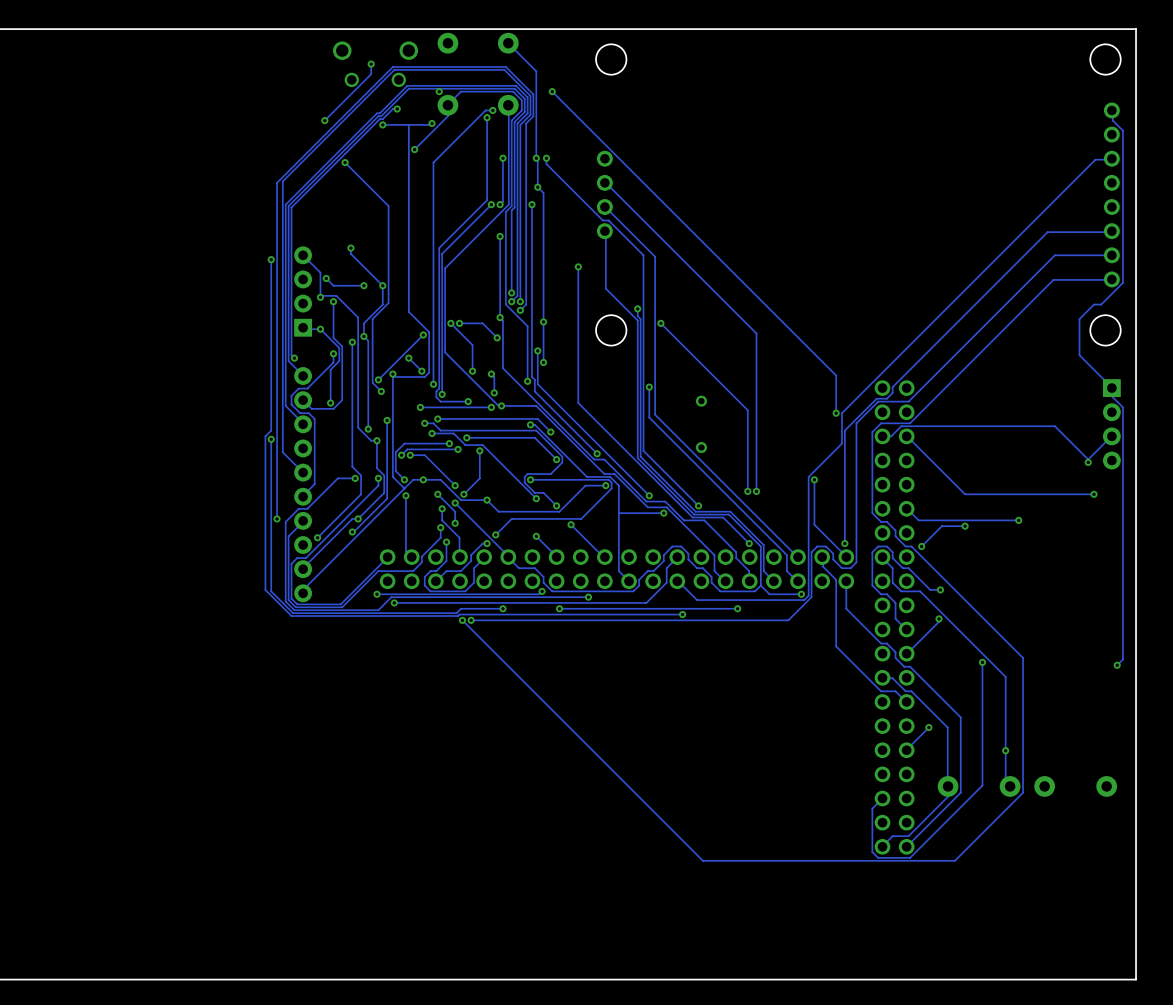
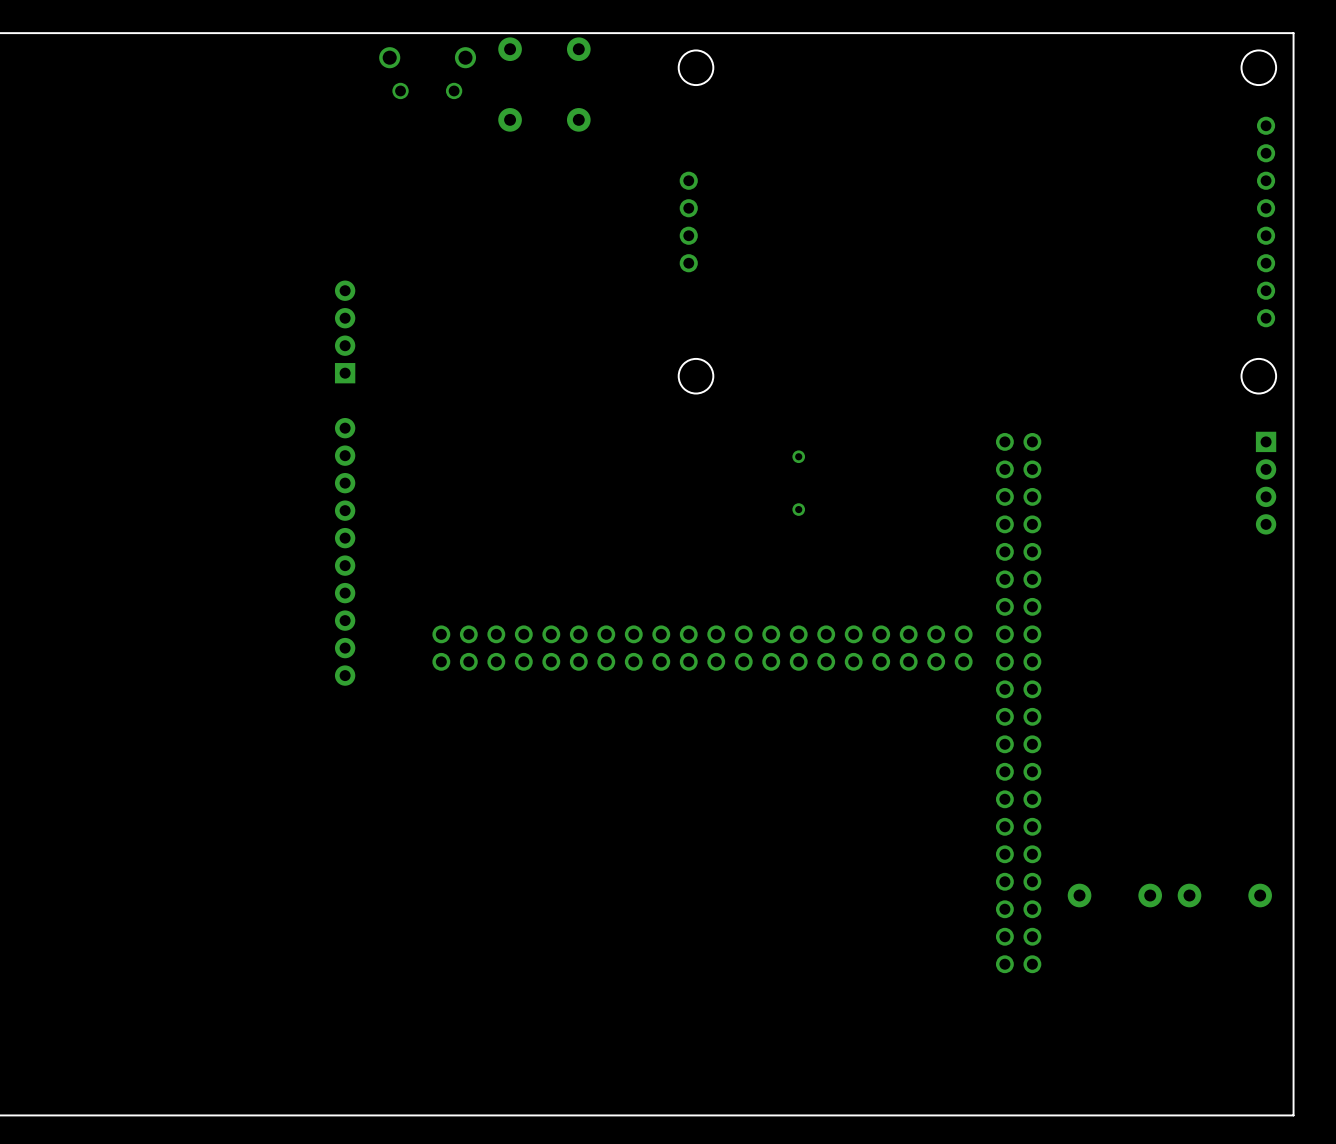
track: (508, 43) (536, 71) (537, 187) (543, 193) (543, 362) -> none
track: (371, 64) (371, 74) (324, 120) -> none
via: (371, 64) -> none
via: (439, 91) -> none
track: (552, 91) (836, 375) (836, 413) -> none
via: (552, 91) -> none
track: (508, 105) (508, 204) (445, 268) (445, 352) (498, 405) (536, 405) (604, 474) (614, 474) (647, 507) (666, 507) (714, 555) (714, 571) (725, 581) -> none
track: (397, 109) (392, 109) (382, 119) (379, 119) (291, 207) (291, 355) (294, 358) -> none
via: (397, 109) -> none
track: (492, 110) (485, 110) (433, 162) (433, 384) -> none
via: (492, 110) -> none
track: (1111, 110) (1112, 120) (1122, 130) (1122, 282) (1101, 304) (1094, 304) (1079, 319) (1079, 355) (1112, 388) (1112, 397) (1122, 407) (1122, 659) (1117, 665) -> none
track: (487, 117) (487, 200) (439, 248) (439, 388) (436, 391) (436, 397) (440, 401) (468, 401) -> none
via: (487, 117) -> none
via: (324, 120) -> none
track: (432, 123) (382, 124) -> none
via: (432, 123) -> none
via: (382, 124) -> none
track: (408, 124) (408, 311) (429, 332) (429, 372) (424, 376) (392, 376) -> none
track: (414, 149) (447, 116) (447, 104) (460, 91) (513, 91) (521, 100) (521, 110) (511, 120) (511, 206) (505, 211) (505, 304) (527, 326) (527, 381) -> none
via: (414, 149) -> none
track: (503, 158) (503, 201) (500, 204) -> none
via: (503, 158) -> none
via: (536, 158) -> none
track: (546, 158) (546, 164) (602, 220) (608, 220) (643, 255) (643, 450) (698, 505) -> none
via: (546, 158) -> none
track: (1111, 158) (1095, 159) (841, 413) (841, 443) (808, 476) (808, 595) (804, 600) (697, 600) (677, 581) -> none
track: (345, 162) (388, 206) (388, 303) (372, 319) (372, 382) (381, 391) -> none
via: (345, 162) -> none
track: (604, 182) (756, 333) (756, 491) -> none
via: (537, 187) -> none
track: (491, 204) (442, 253) (442, 394) -> none
via: (491, 204) -> none
via: (500, 204) -> none
track: (531, 204) (531, 376) (534, 379) (534, 391) (597, 453) -> none
via: (531, 204) -> none
track: (604, 207) (655, 256) (655, 414) (798, 557) -> none
track: (604, 231) (605, 288) (637, 320) (637, 458) (694, 514) (728, 514) (760, 546) (760, 585) -> none
track: (1111, 231) (1047, 232) (892, 387) (892, 392) (886, 398) (876, 398) (844, 430) (844, 543) -> none
track: (500, 236) (500, 317) (503, 320) (503, 368) (594, 459) (604, 459) (646, 501) (665, 501) (684, 520) (704, 520) (736, 552) (736, 558) (749, 571) (749, 581) -> none
via: (500, 236) -> none
track: (350, 248) (350, 253) (382, 285) (382, 304) (363, 323) (363, 336) (368, 340) (368, 429) -> none
via: (350, 248) -> none
track: (303, 255) (320, 272) (320, 297) -> none
track: (1111, 255) (1054, 255) (908, 401) (878, 401) (856, 423) (856, 562) (850, 568) (841, 568) (833, 559) (833, 553) (826, 546) (817, 546) (811, 552) (811, 597) (788, 620) (471, 620) -> none
track: (271, 259) (271, 430) (265, 436) (265, 589) (291, 616) (682, 614) -> none
via: (271, 259) -> none
track: (578, 266) (578, 403) (692, 517) (723, 517) (749, 543) -> none
via: (578, 266) -> none
track: (326, 278) (333, 285) (363, 285) -> none
via: (326, 278) -> none
track: (1111, 279) (1053, 279) (910, 423) (881, 423) (872, 432) (872, 513) (881, 521) (886, 521) (895, 530) (895, 536) (905, 546) (911, 546) (1023, 658) (1023, 792) (954, 860) (702, 860) (462, 620) -> none
via: (363, 285) -> none
via: (382, 285) -> none
track: (511, 292) (514, 122) (524, 111) (524, 98) (514, 88) (408, 88) (381, 116) (378, 116) (288, 206) (288, 361) (303, 376) -> none
via: (511, 292) -> none
track: (320, 295) (336, 295) (358, 317) (358, 427) (371, 440) (376, 440) (376, 468) (384, 475) (384, 492) (358, 518) (352, 518) (303, 569) -> none
via: (320, 297) -> none
track: (333, 301) (333, 337) (342, 346) (342, 400) (333, 408) (311, 408) (303, 400) -> none
via: (333, 301) -> none
track: (511, 301) (517, 295) (517, 123) (527, 113) (527, 97) (516, 85) (407, 85) (379, 113) (376, 113) (285, 204) (285, 405) (303, 424) -> none
via: (511, 301) -> none
track: (520, 301) (520, 124) (530, 114) (530, 95) (504, 69) (394, 69) (282, 181) (282, 452) (303, 472) -> none
via: (520, 301) -> none
track: (637, 308) (637, 316) (640, 319) (640, 456) (695, 511) (730, 511) (763, 545) (763, 571) (773, 581) -> none
via: (637, 308) -> none
track: (520, 310) (526, 304) (526, 123) (533, 116) (533, 94) (505, 66) (392, 66) (277, 182) (277, 518) -> none
via: (520, 310) -> none
via: (500, 317) -> none
via: (543, 321) -> none
track: (450, 323) (472, 345) (472, 371) -> none
via: (450, 323) -> none
track: (459, 323) (482, 323) (497, 337) -> none
via: (459, 323) -> none
track: (660, 323) (747, 410) (747, 491) -> none
via: (660, 323) -> none
track: (303, 327) (320, 329) (339, 348) (339, 361) (330, 369) (330, 403) -> none
via: (320, 329) -> none
track: (423, 334) (378, 379) -> none
via: (423, 334) -> none
via: (363, 336) -> none
via: (497, 337) -> none
track: (352, 342) (352, 466) (361, 475) (361, 494) (317, 537) -> none
via: (352, 342) -> none
track: (537, 350) (537, 384) (649, 495) -> none
via: (537, 350) -> none
track: (333, 353) (333, 362) (307, 388) (298, 388) (291, 395) (291, 404) (300, 413) (308, 413) (314, 419) (314, 484) (303, 496) -> none
via: (333, 353) -> none
via: (294, 358) -> none
track: (408, 358) (421, 371) -> none
via: (408, 358) -> none
via: (543, 362) -> none
via: (421, 371) -> none
via: (472, 371) -> none
track: (392, 374) (392, 476) (404, 488) -> none
via: (392, 374) -> none
track: (491, 374) (494, 376) (494, 392) -> none
via: (491, 374) -> none
via: (378, 379) -> none
via: (527, 381) -> none
via: (433, 384) -> none
track: (649, 387) (649, 417) (786, 555) (786, 571) (798, 581) -> none
via: (649, 387) -> none
via: (381, 391) -> none
via: (494, 392) -> none
via: (442, 394) -> none
via: (468, 401) -> none
via: (330, 403) -> none
via: (501, 405) -> none
via: (420, 407) -> none
track: (491, 407) (420, 407) -> none
via: (491, 407) -> none
via: (836, 413) -> none
track: (437, 419) (537, 419) (550, 432) -> none
via: (437, 419) -> none
track: (387, 420) (387, 498) (352, 531) -> none
via: (387, 420) -> none
track: (424, 423) (433, 423) (440, 430) (536, 430) (562, 456) (562, 462) (550, 474) (527, 474) (524, 476) (524, 482) (534, 492) (543, 492) (556, 505) -> none
via: (424, 423) -> none
track: (530, 424) (534, 424) (587, 476) (610, 476) (618, 485) (618, 571) (629, 581) -> none
via: (530, 424) -> none
via: (368, 429) -> none
via: (550, 432) -> none
track: (432, 433) (453, 433) (465, 445) (482, 445) (536, 498) -> none
via: (432, 433) -> none
track: (882, 436) (891, 436) (901, 426) (1054, 426) (1088, 459) -> none
track: (906, 436) (965, 494) (1094, 494) -> none
track: (1111, 436) (1088, 459) -> none
track: (466, 437) (534, 437) (556, 459) -> none
via: (466, 437) -> none
track: (271, 439) (271, 591) (292, 613) (456, 613) (460, 608) (503, 608) -> none
via: (271, 439) -> none
via: (376, 440) -> none
track: (449, 443) (404, 443) (395, 452) (395, 471) (404, 479) -> none
via: (449, 443) -> none
track: (458, 449) (407, 449) (401, 455) -> none
via: (458, 449) -> none
track: (479, 450) (479, 478) (463, 494) -> none
via: (479, 450) -> none
via: (597, 453) -> none
via: (401, 455) -> none
track: (410, 455) (424, 455) (455, 485) -> none
via: (410, 455) -> none
via: (556, 459) -> none
via: (1088, 462) -> none
track: (355, 478) (337, 478) (307, 508) (298, 508) (285, 521) (285, 601) (294, 610) (378, 610) (391, 597) (588, 597) -> none
via: (355, 478) -> none
track: (378, 478) (378, 485) (305, 558) (297, 558) (291, 563) (291, 598) (297, 604) (340, 604) (387, 557) -> none
via: (378, 478) -> none
via: (404, 479) -> none
via: (423, 479) -> none
track: (530, 479) (608, 479) (611, 482) (611, 488) (581, 518) (511, 518) (495, 534) -> none
via: (530, 479) -> none
track: (814, 479) (814, 524) (846, 557) -> none
via: (814, 479) -> none
via: (455, 485) -> none
track: (605, 485) (585, 485) (559, 511) (498, 511) (487, 500) (460, 500) (440, 479) (413, 479) (303, 589) (303, 593) -> none
via: (605, 485) -> none
via: (747, 491) -> none
via: (756, 491) -> none
track: (437, 494) (455, 511) (455, 523) -> none
via: (437, 494) -> none
via: (463, 494) -> none
via: (1094, 494) -> none
track: (405, 495) (405, 550) (411, 557) -> none
via: (405, 495) -> none
via: (649, 495) -> none
via: (536, 498) -> none
via: (487, 500) -> none
track: (455, 503) (518, 568) (534, 568) (543, 576) (543, 582) (552, 591) (633, 591) (639, 585) (639, 579) (647, 571) (653, 571) (663, 560) (663, 555) (672, 546) (681, 546) (688, 553) (688, 559) (697, 568) (702, 568) (711, 576) (711, 582) (720, 591) (755, 591) (760, 585) -> none
via: (455, 503) -> none
via: (556, 505) -> none
via: (698, 505) -> none
track: (442, 508) (442, 520) (459, 537) (460, 557) -> none
via: (442, 508) -> none
track: (906, 508) (918, 520) (1018, 520) -> none
track: (663, 513) (618, 513) -> none
via: (663, 513) -> none
via: (277, 518) -> none
via: (358, 518) -> none
track: (303, 520) (288, 536) (288, 600) (295, 607) (342, 607) (378, 571) (413, 571) (421, 562) (421, 556) (440, 537) (440, 527) -> none
via: (1018, 520) -> none
via: (455, 523) -> none
track: (571, 524) (604, 557) -> none
via: (571, 524) -> none
track: (965, 526) (941, 526) (921, 546) -> none
via: (965, 526) -> none
via: (440, 527) -> none
via: (352, 531) -> none
via: (495, 534) -> none
track: (536, 536) (556, 557) -> none
via: (536, 536) -> none
via: (317, 537) -> none
track: (446, 542) (446, 560) (436, 571) (430, 571) (424, 576) (424, 585) (430, 591) (465, 591) (474, 582) (474, 568) (484, 557) -> none
via: (446, 542) -> none
track: (487, 543) (482, 543) (471, 555) (471, 560) (460, 571) (446, 571) (435, 581) -> none
via: (487, 543) -> none
via: (749, 543) -> none
via: (844, 543) -> none
via: (921, 546) -> none
track: (677, 557) (666, 568) (666, 582) (646, 602) (394, 602) -> none
track: (822, 557) (823, 566) (836, 579) (836, 646) (881, 691) (895, 691) (906, 701) -> none
track: (882, 557) (892, 568) (892, 582) (901, 591) (920, 591) (1005, 676) (1005, 781) (1010, 786) -> none
track: (846, 581) (846, 608) (881, 643) (886, 643) (895, 652) (895, 658) (904, 666) (910, 666) (960, 717) (960, 792) (906, 846) -> none
track: (760, 585) (769, 594) (801, 594) -> none
track: (940, 589) (930, 589) (908, 568) (902, 568) (892, 558) (892, 552) (886, 546) (878, 546) (872, 552) (872, 585) (881, 594) (886, 594) (895, 602) (895, 618) (906, 629) -> none
via: (940, 589) -> none
track: (542, 591) (539, 594) (376, 594) -> none
via: (542, 591) -> none
via: (376, 594) -> none
via: (801, 594) -> none
via: (588, 597) -> none
via: (394, 602) -> none
via: (503, 608) -> none
via: (559, 608) -> none
track: (737, 608) (559, 608) -> none
via: (737, 608) -> none
via: (682, 614) -> none
track: (939, 618) (939, 621) (906, 653) -> none
via: (939, 618) -> none
via: (462, 620) -> none
via: (471, 620) -> none
track: (982, 662) (982, 785) (910, 857) (878, 857) (872, 852) (872, 808) (882, 798) -> none
via: (982, 662) -> none
via: (1117, 665) -> none
track: (882, 677) (892, 678) (905, 691) (911, 691) (947, 727) (948, 786) (947, 797) (908, 836) (892, 836) (882, 846) -> none
track: (928, 727) (906, 750) -> none
via: (928, 727) -> none
via: (1005, 750) -> none

